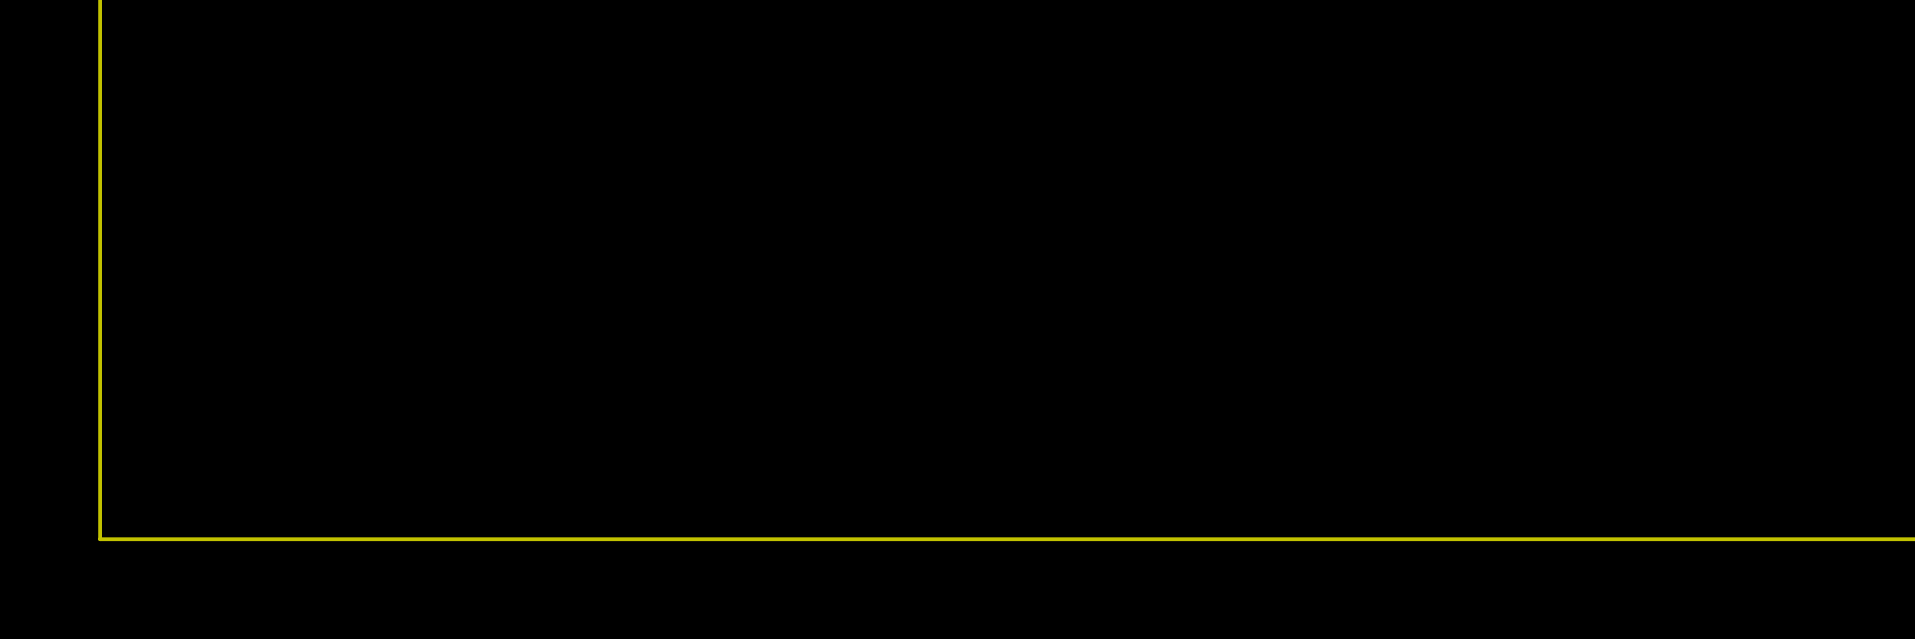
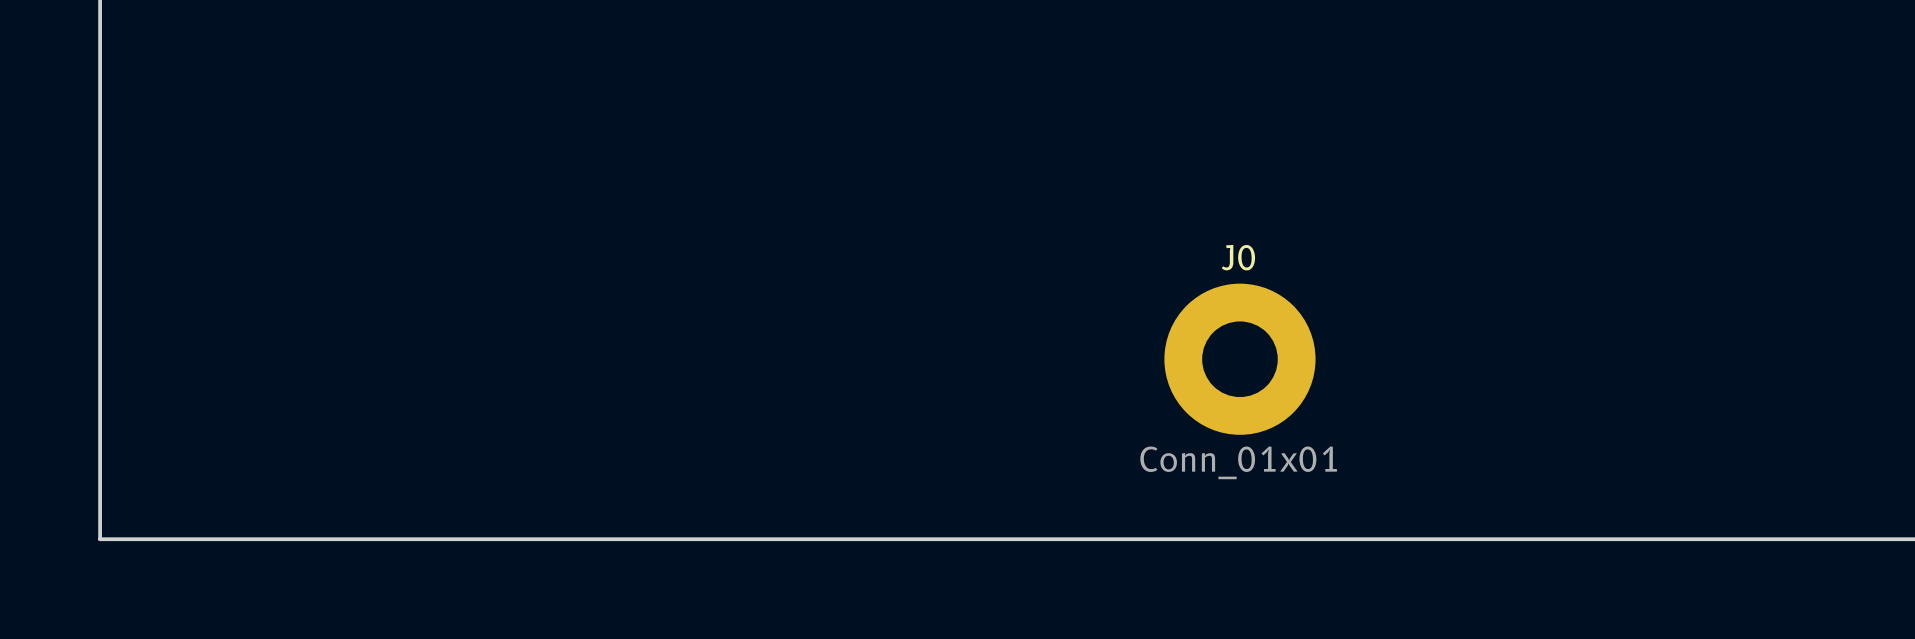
J0: none -> Conn_01x01 (1239, 359)

